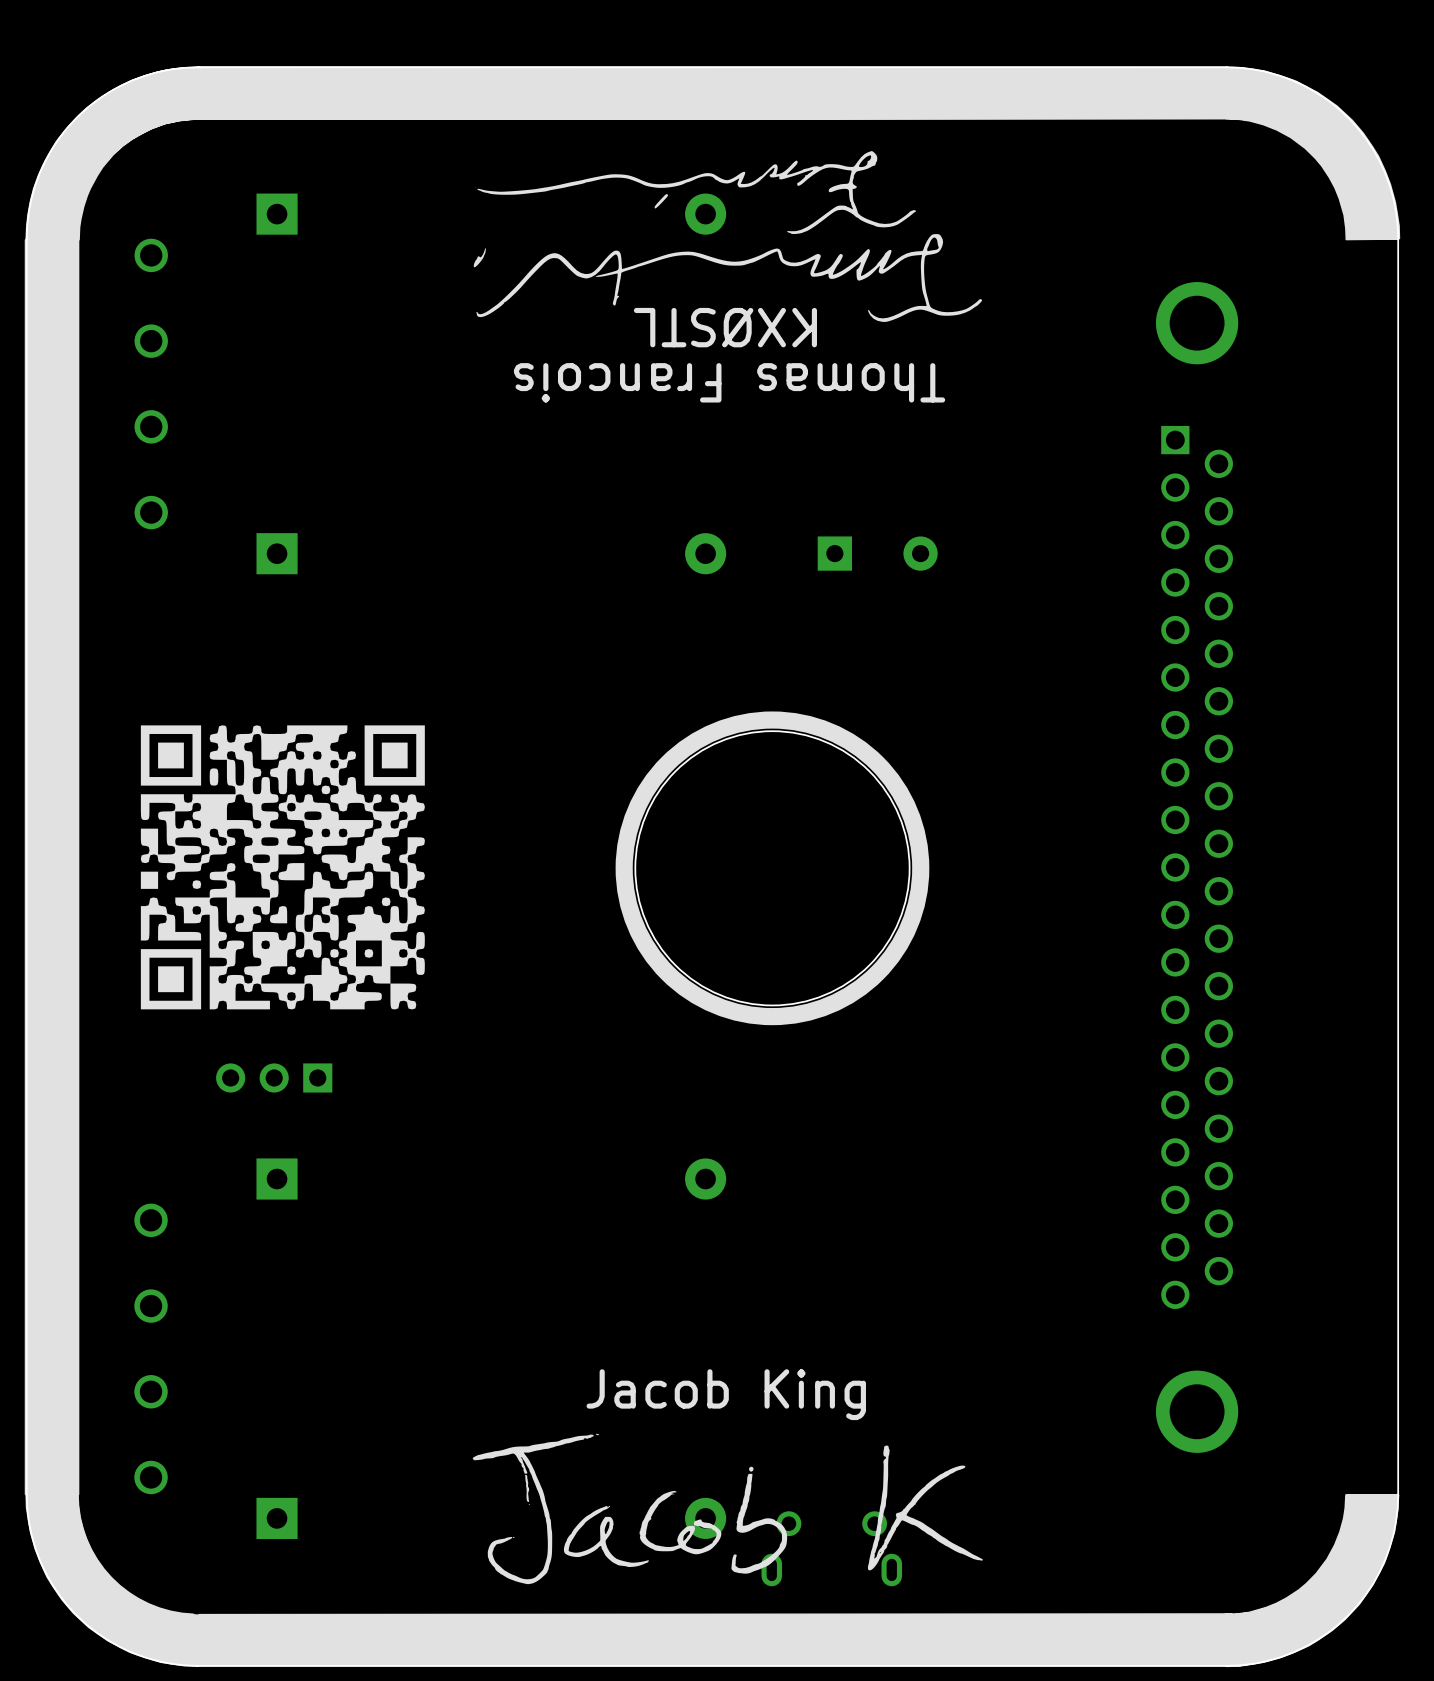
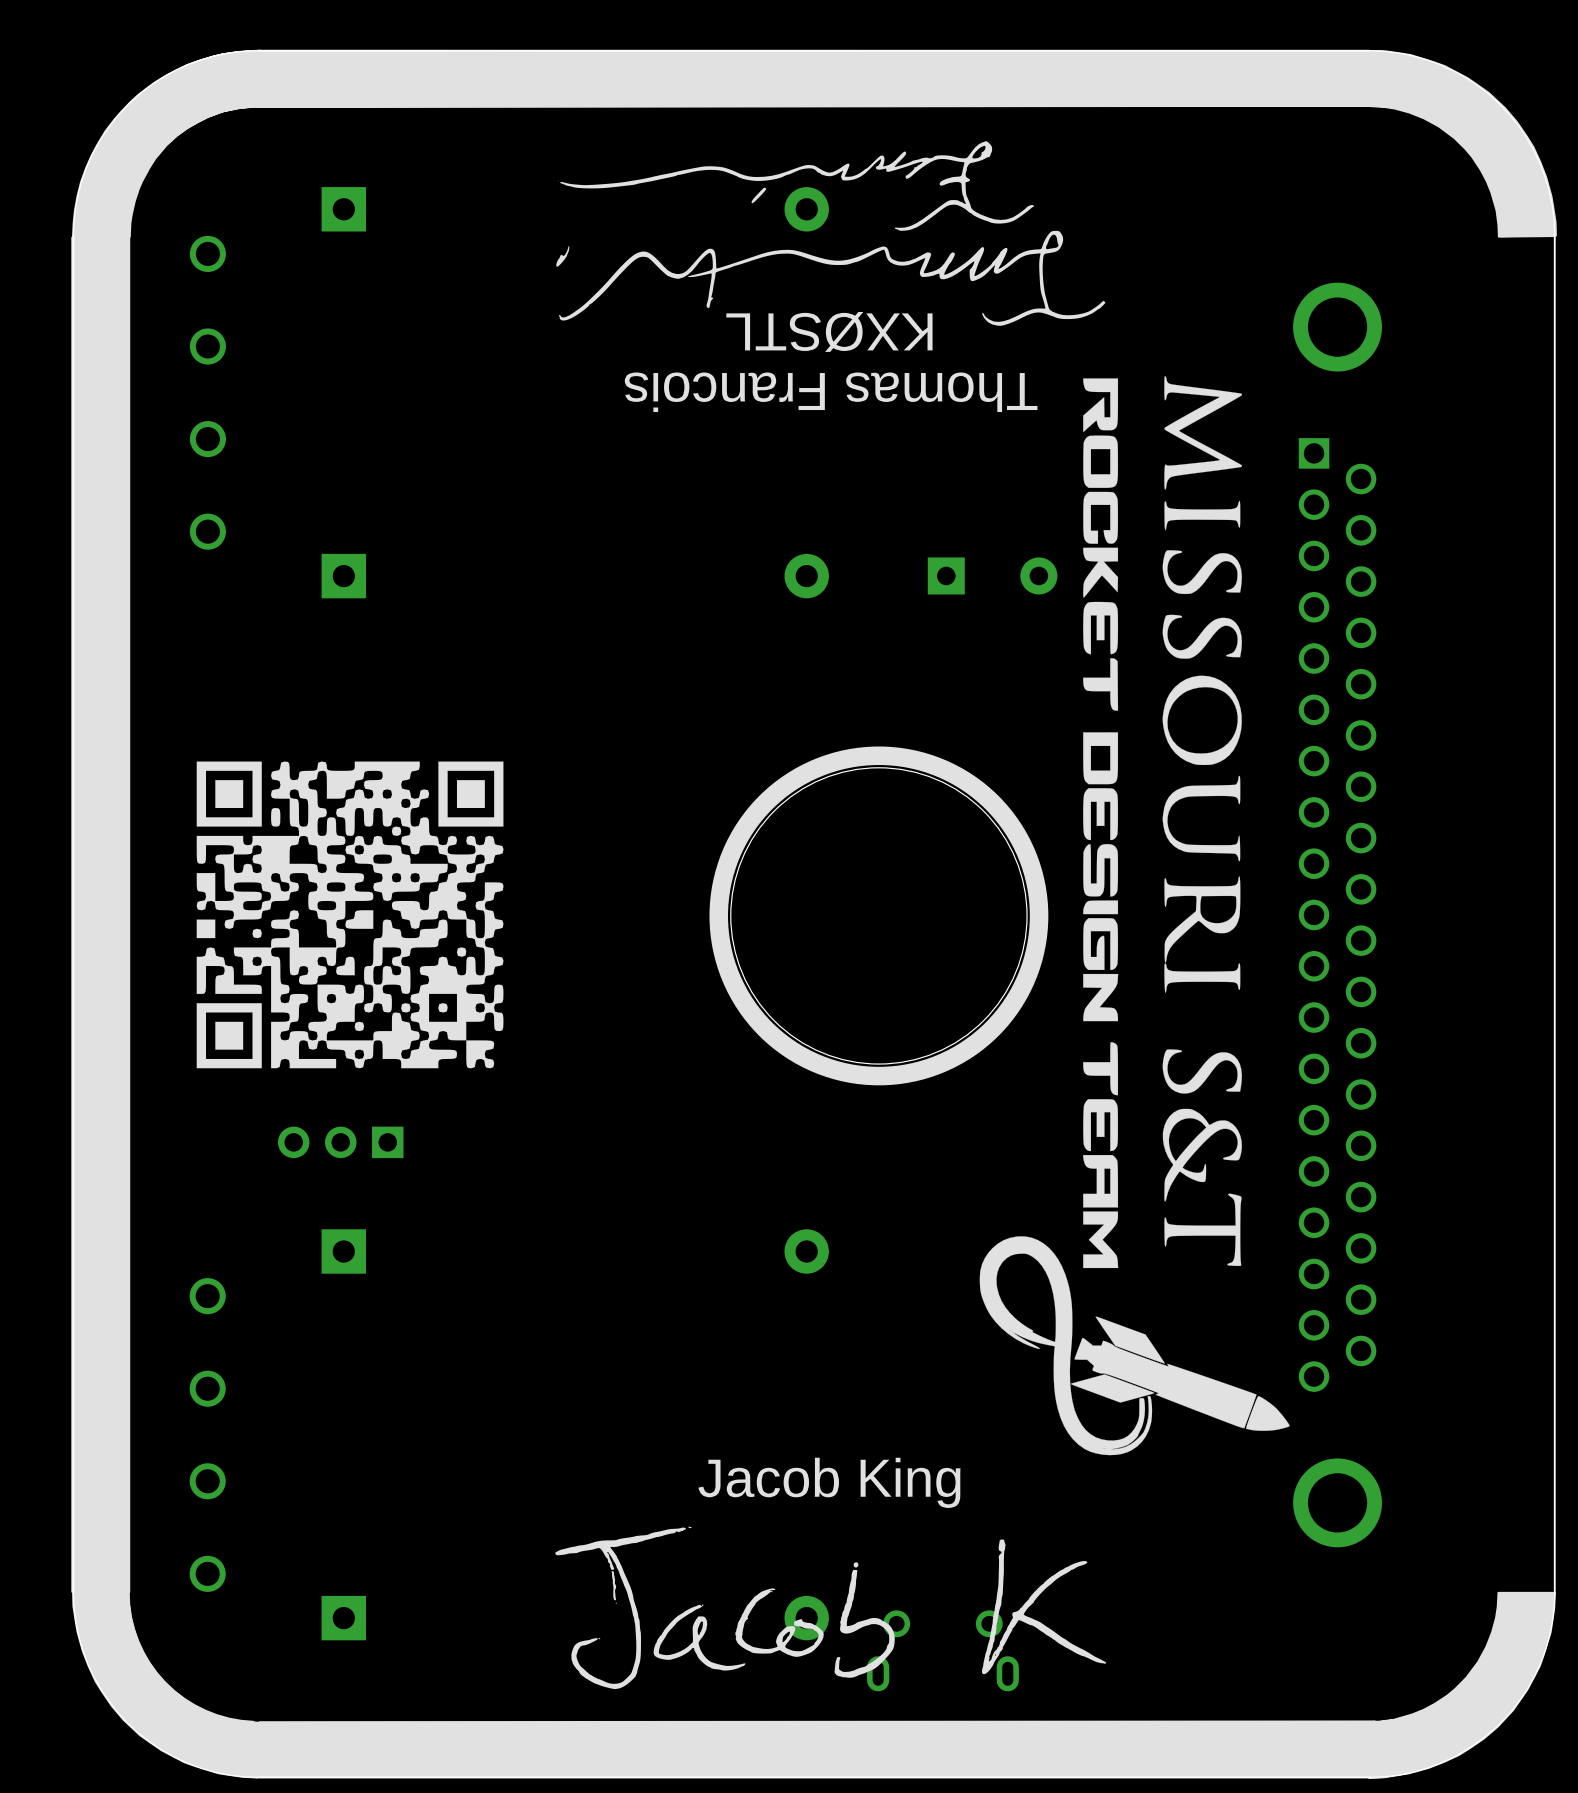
drawing: none -> [979, 376, 1290, 1456]

